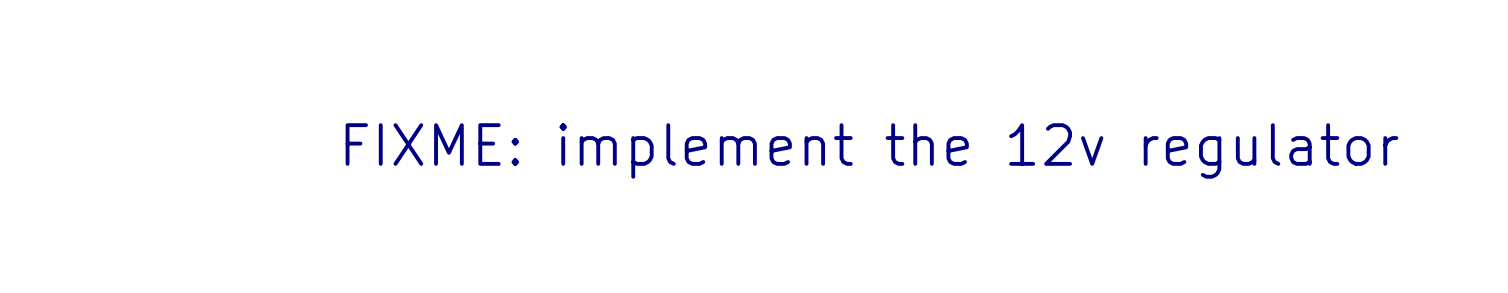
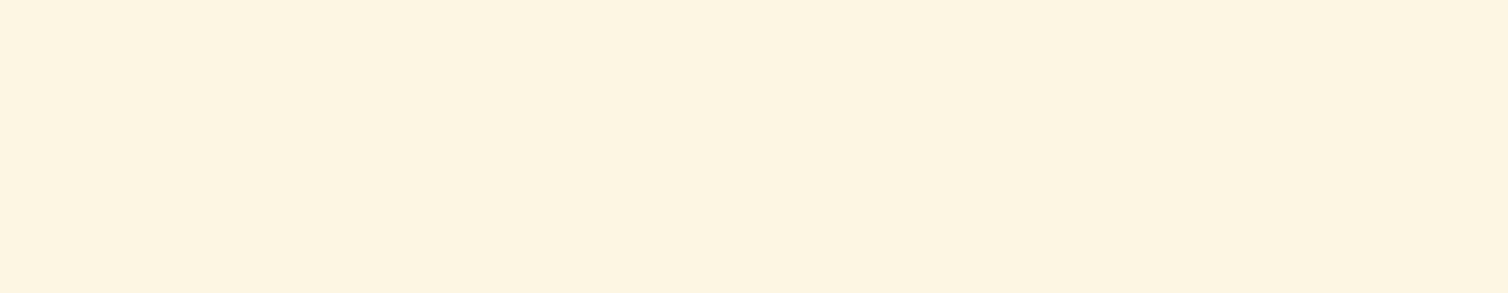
text: FIXME: implement the 12v regulator (871, 150) -> none

